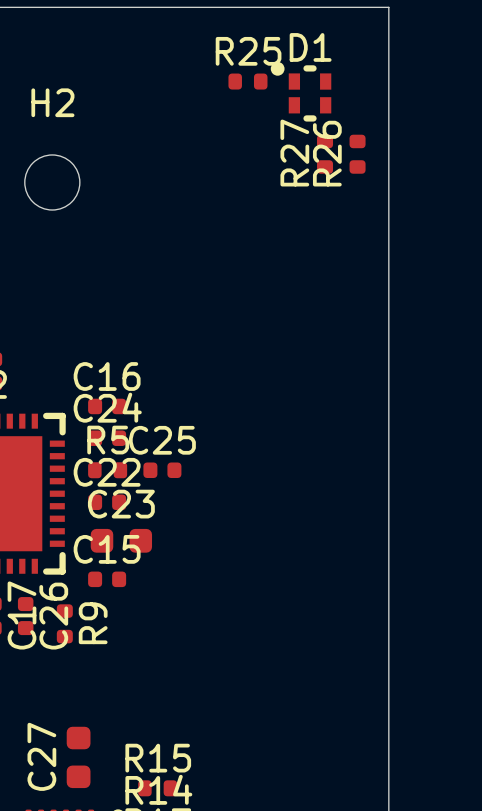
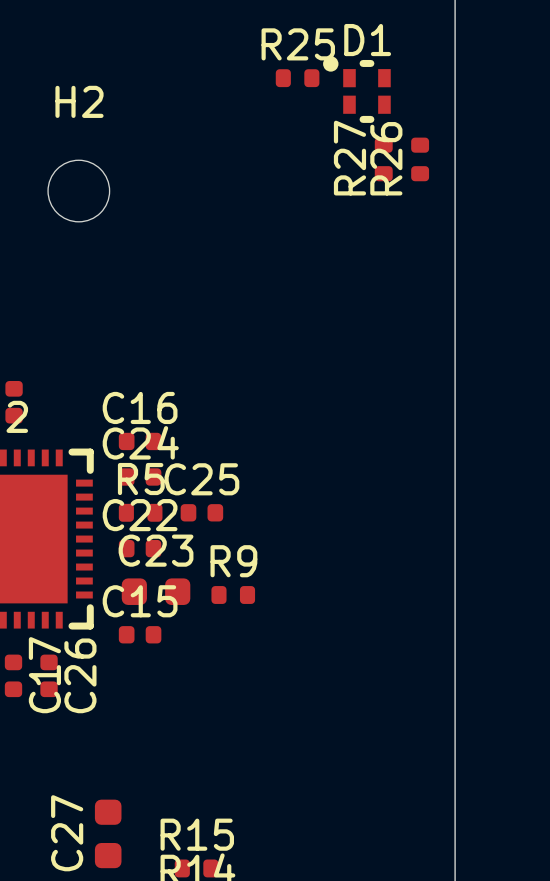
R9 rotation: 0° (64, 623) -> 90° clockwise (233, 595)
R9 position: (64, 623) -> (233, 595)

